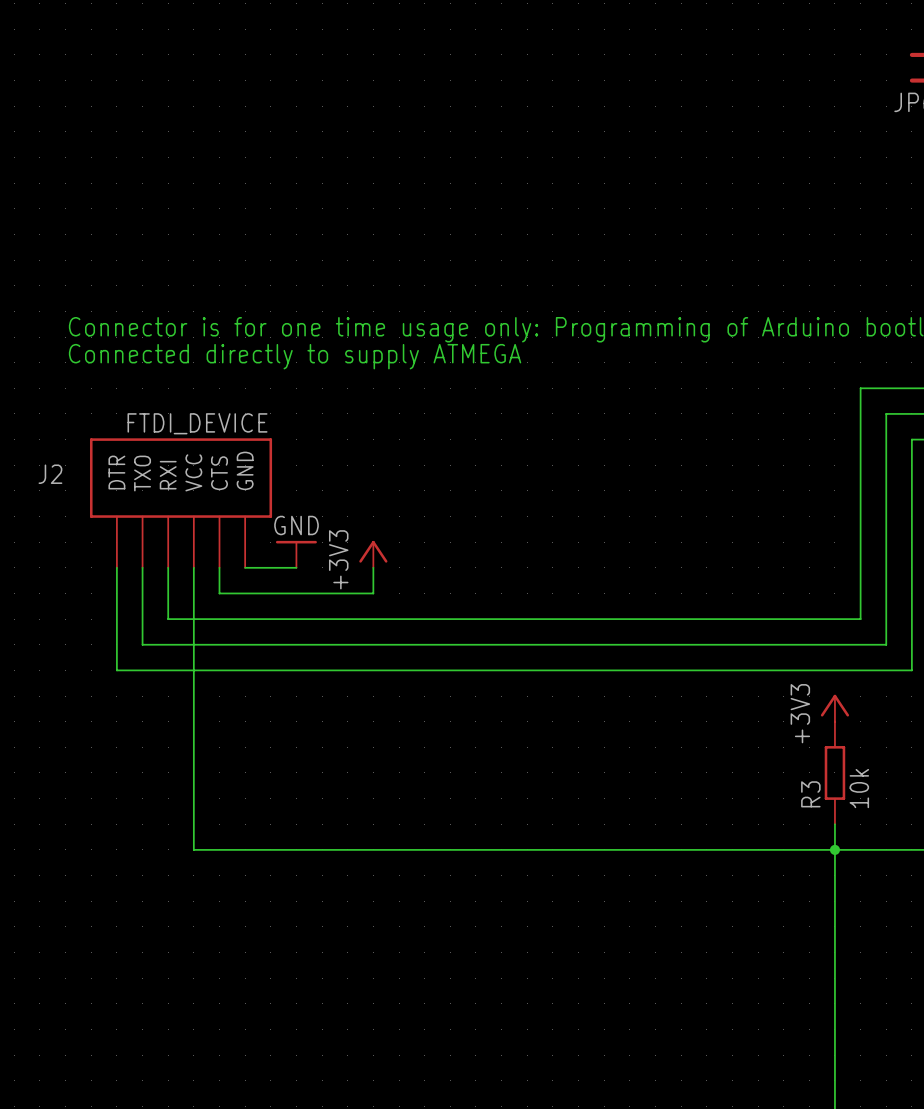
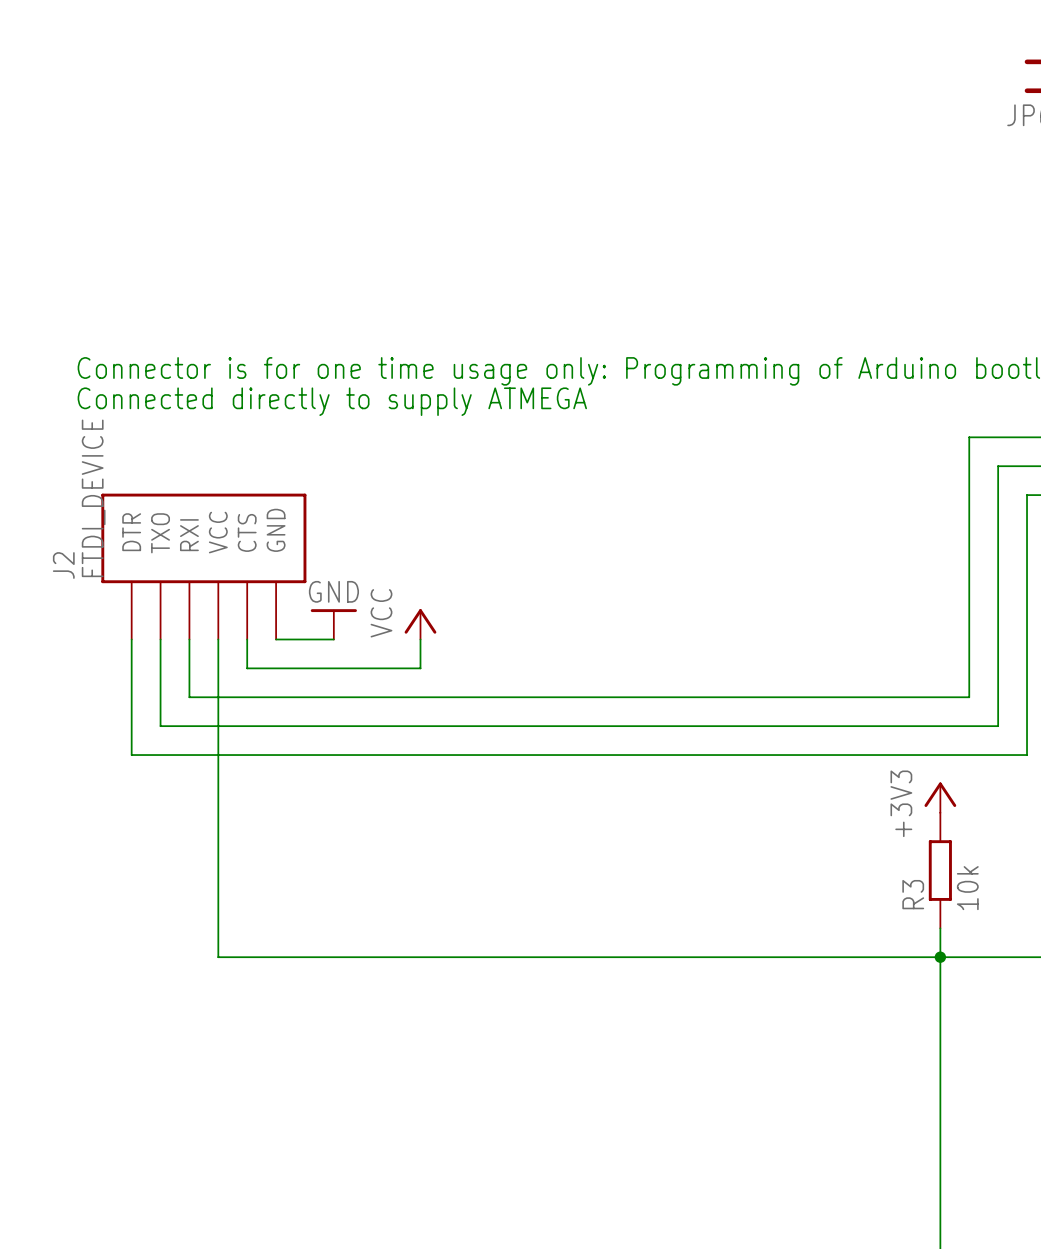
J2 value rotation: 0° (197, 423) -> 90° counterclockwise (93, 498)
J2 name rotation: 0° (50, 474) -> 90° counterclockwise (63, 565)
power symbol: +3V3 (373, 554) -> VCC (420, 624)

